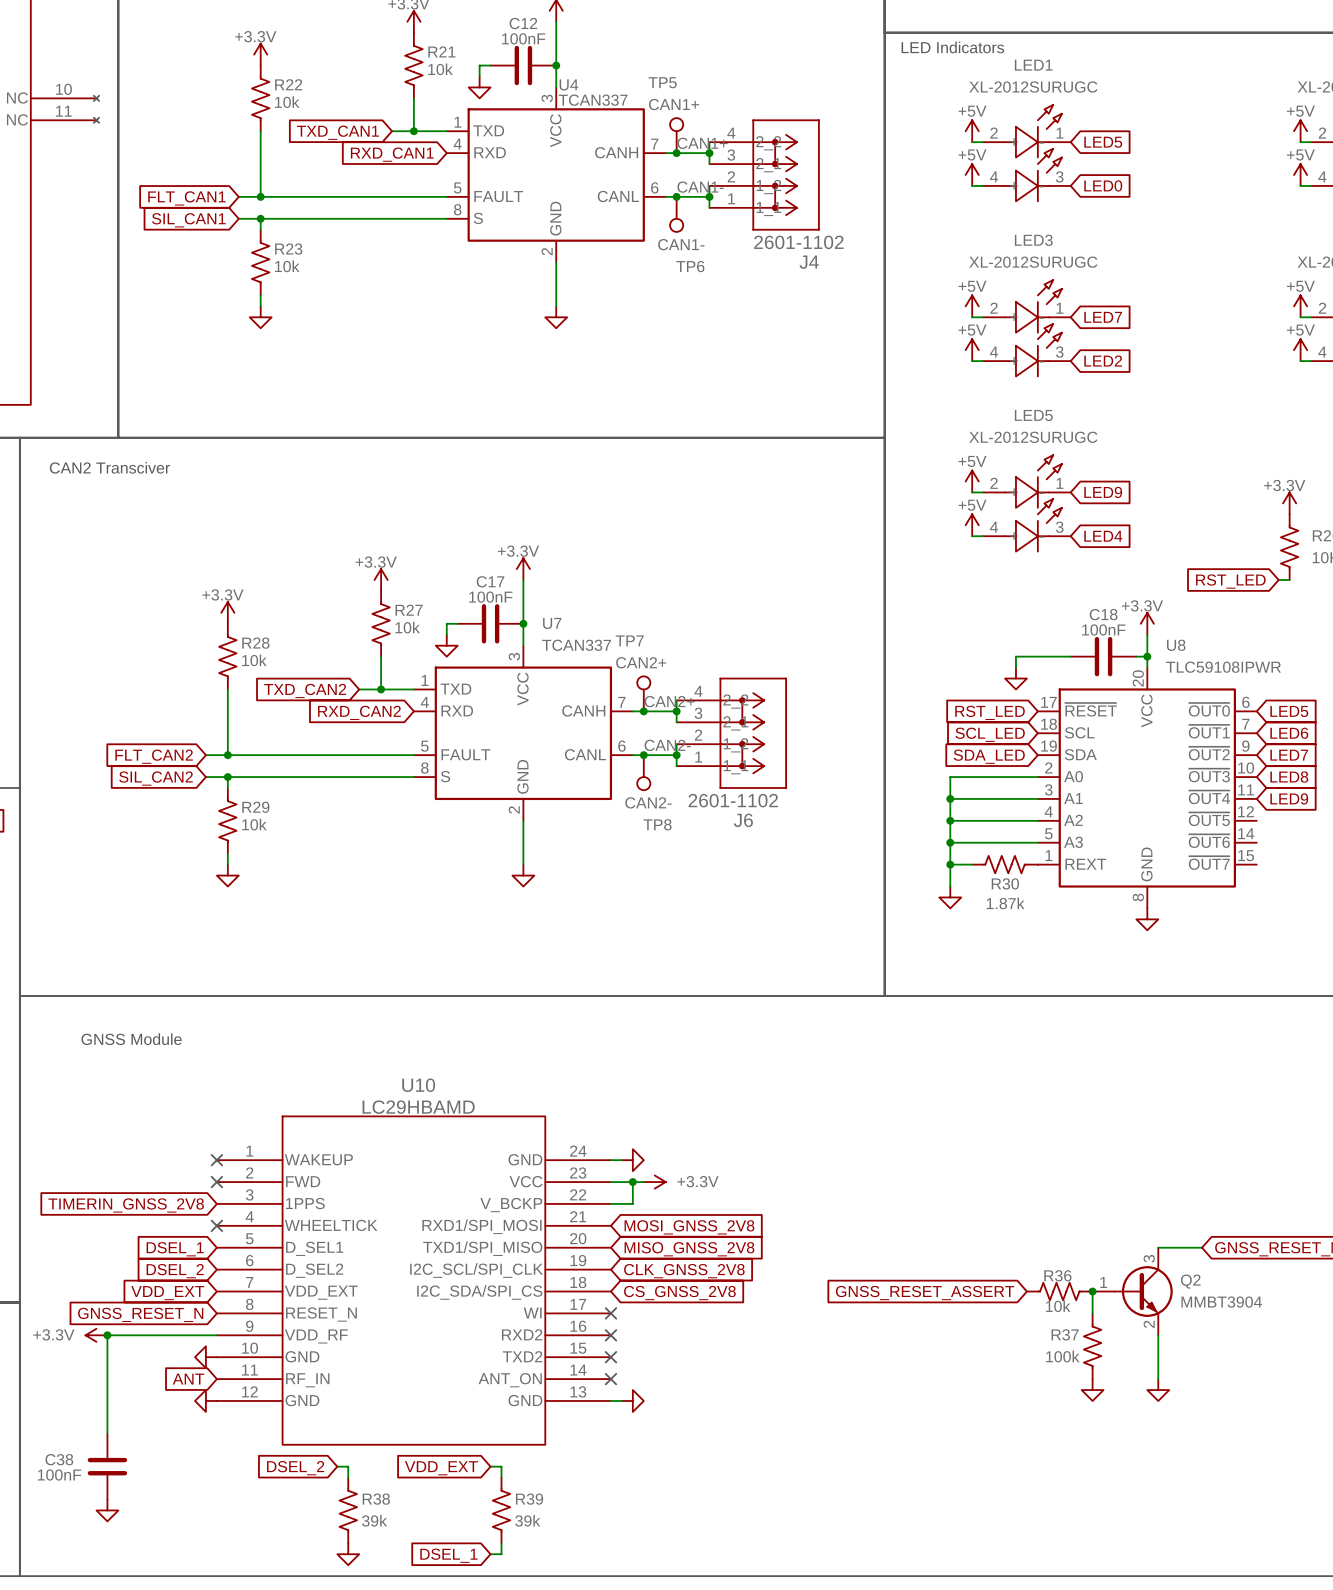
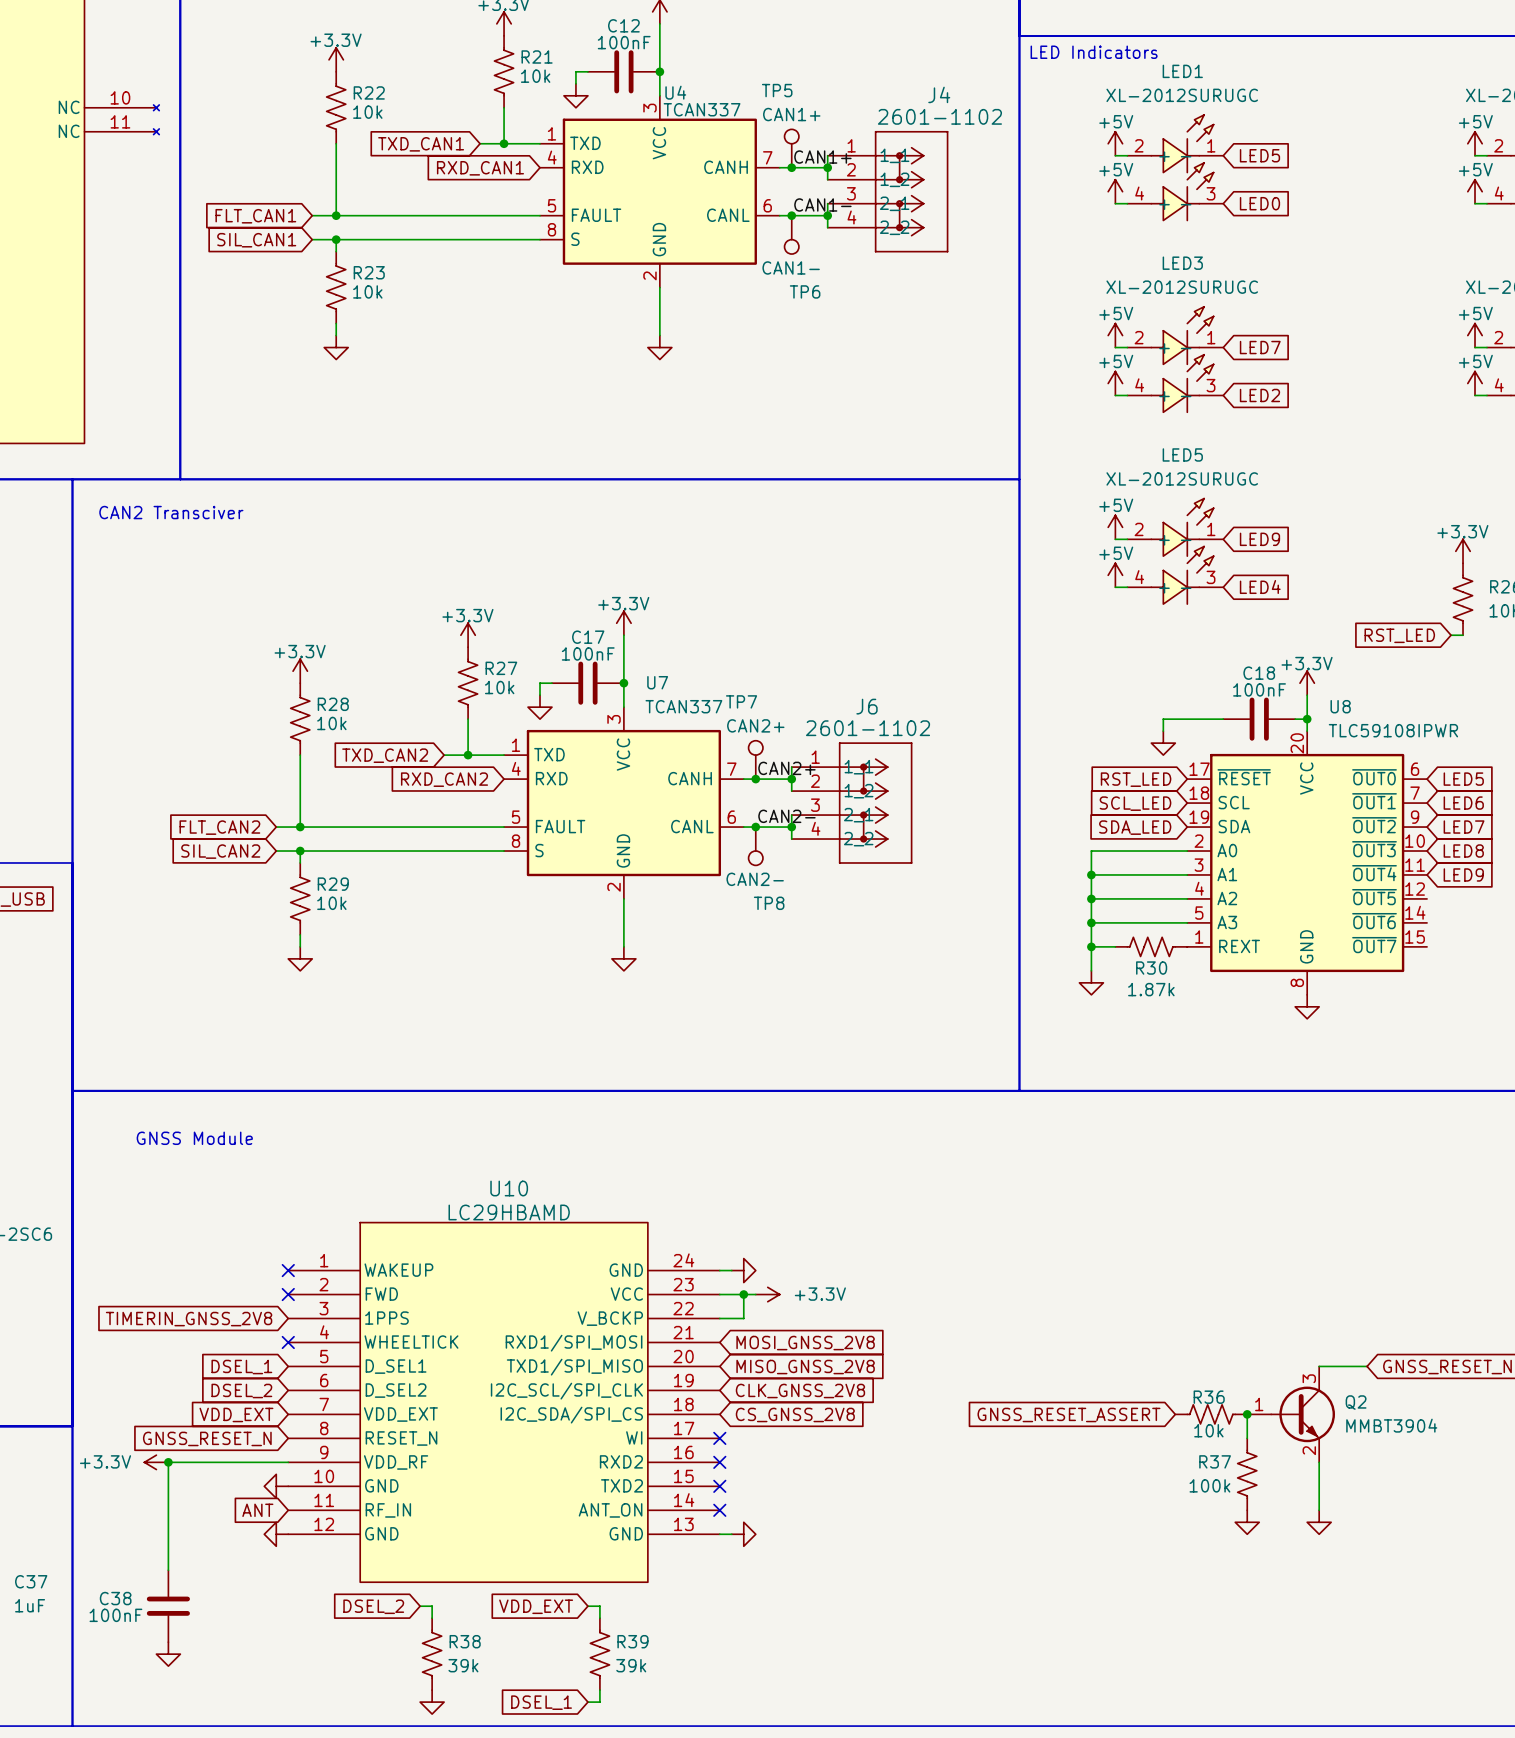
J4 flip: as is (786, 175) -> up-down (911, 191)
J6 flip: as is (753, 733) -> up-down (875, 803)

